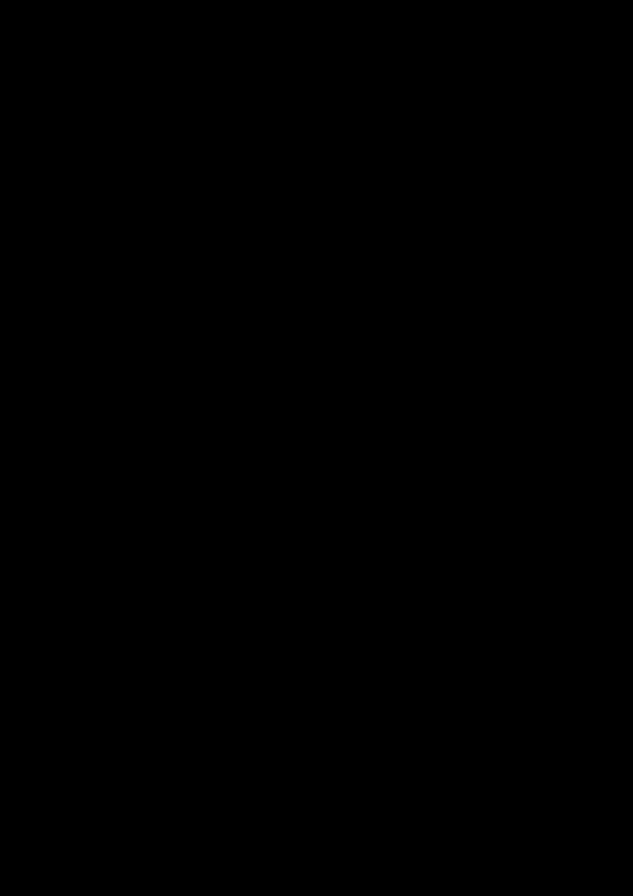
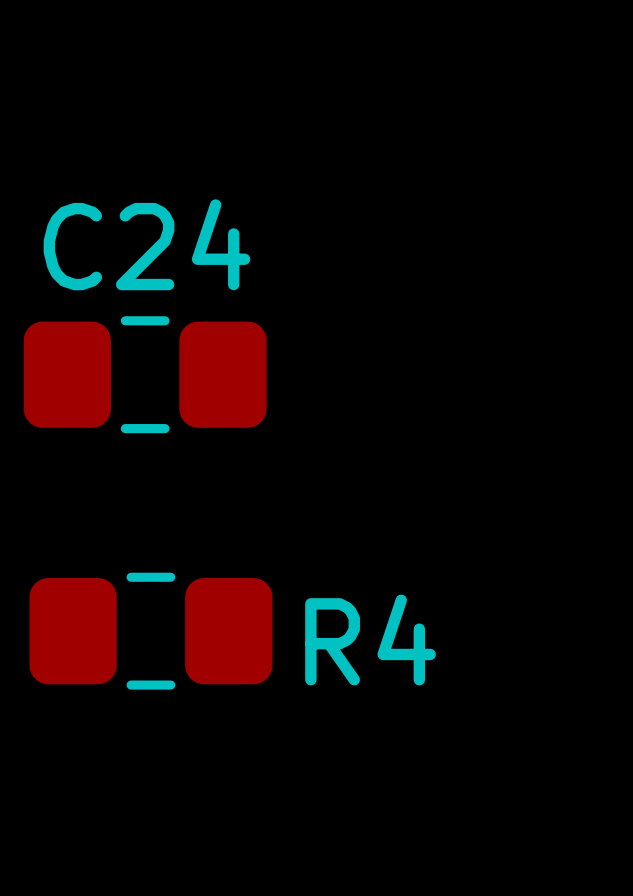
C24: none -> (145, 374)
R4: none -> (150, 631)

